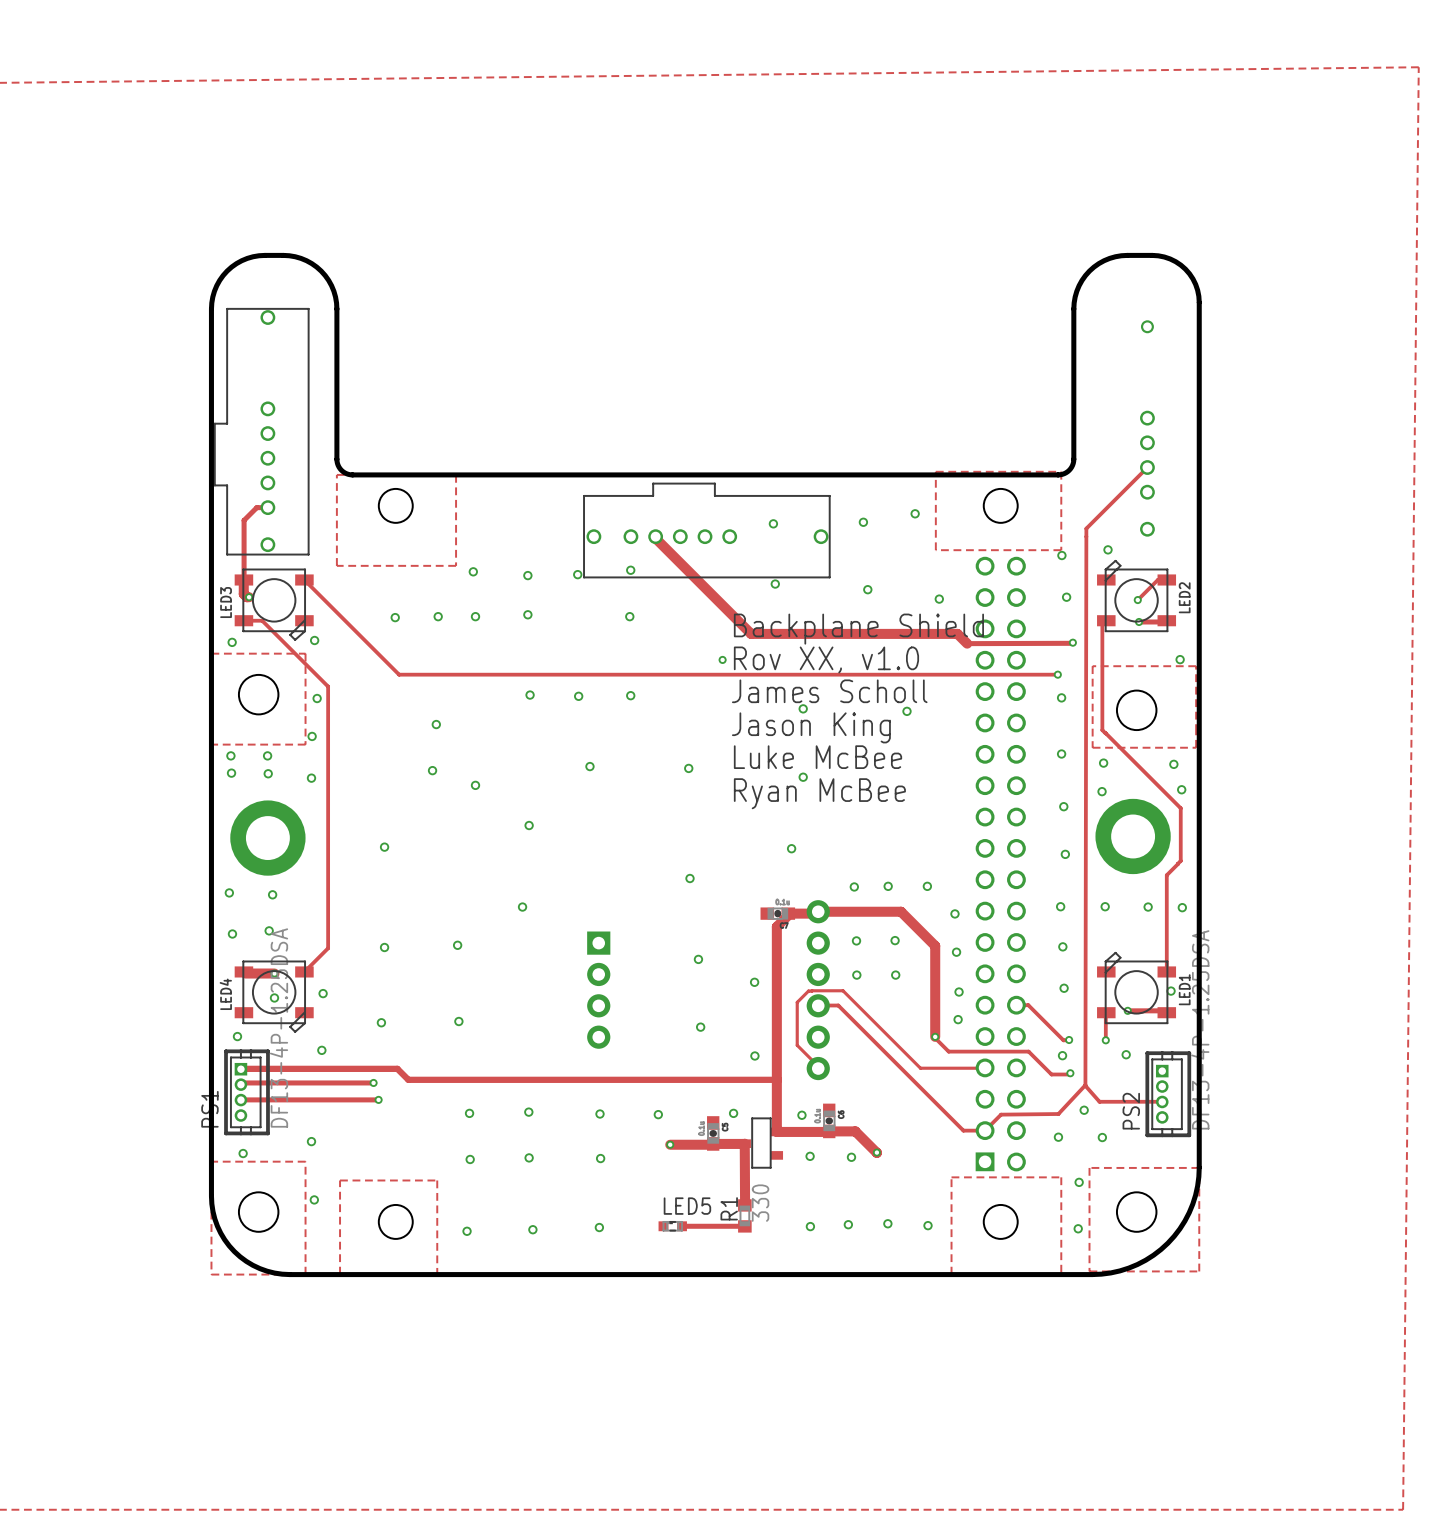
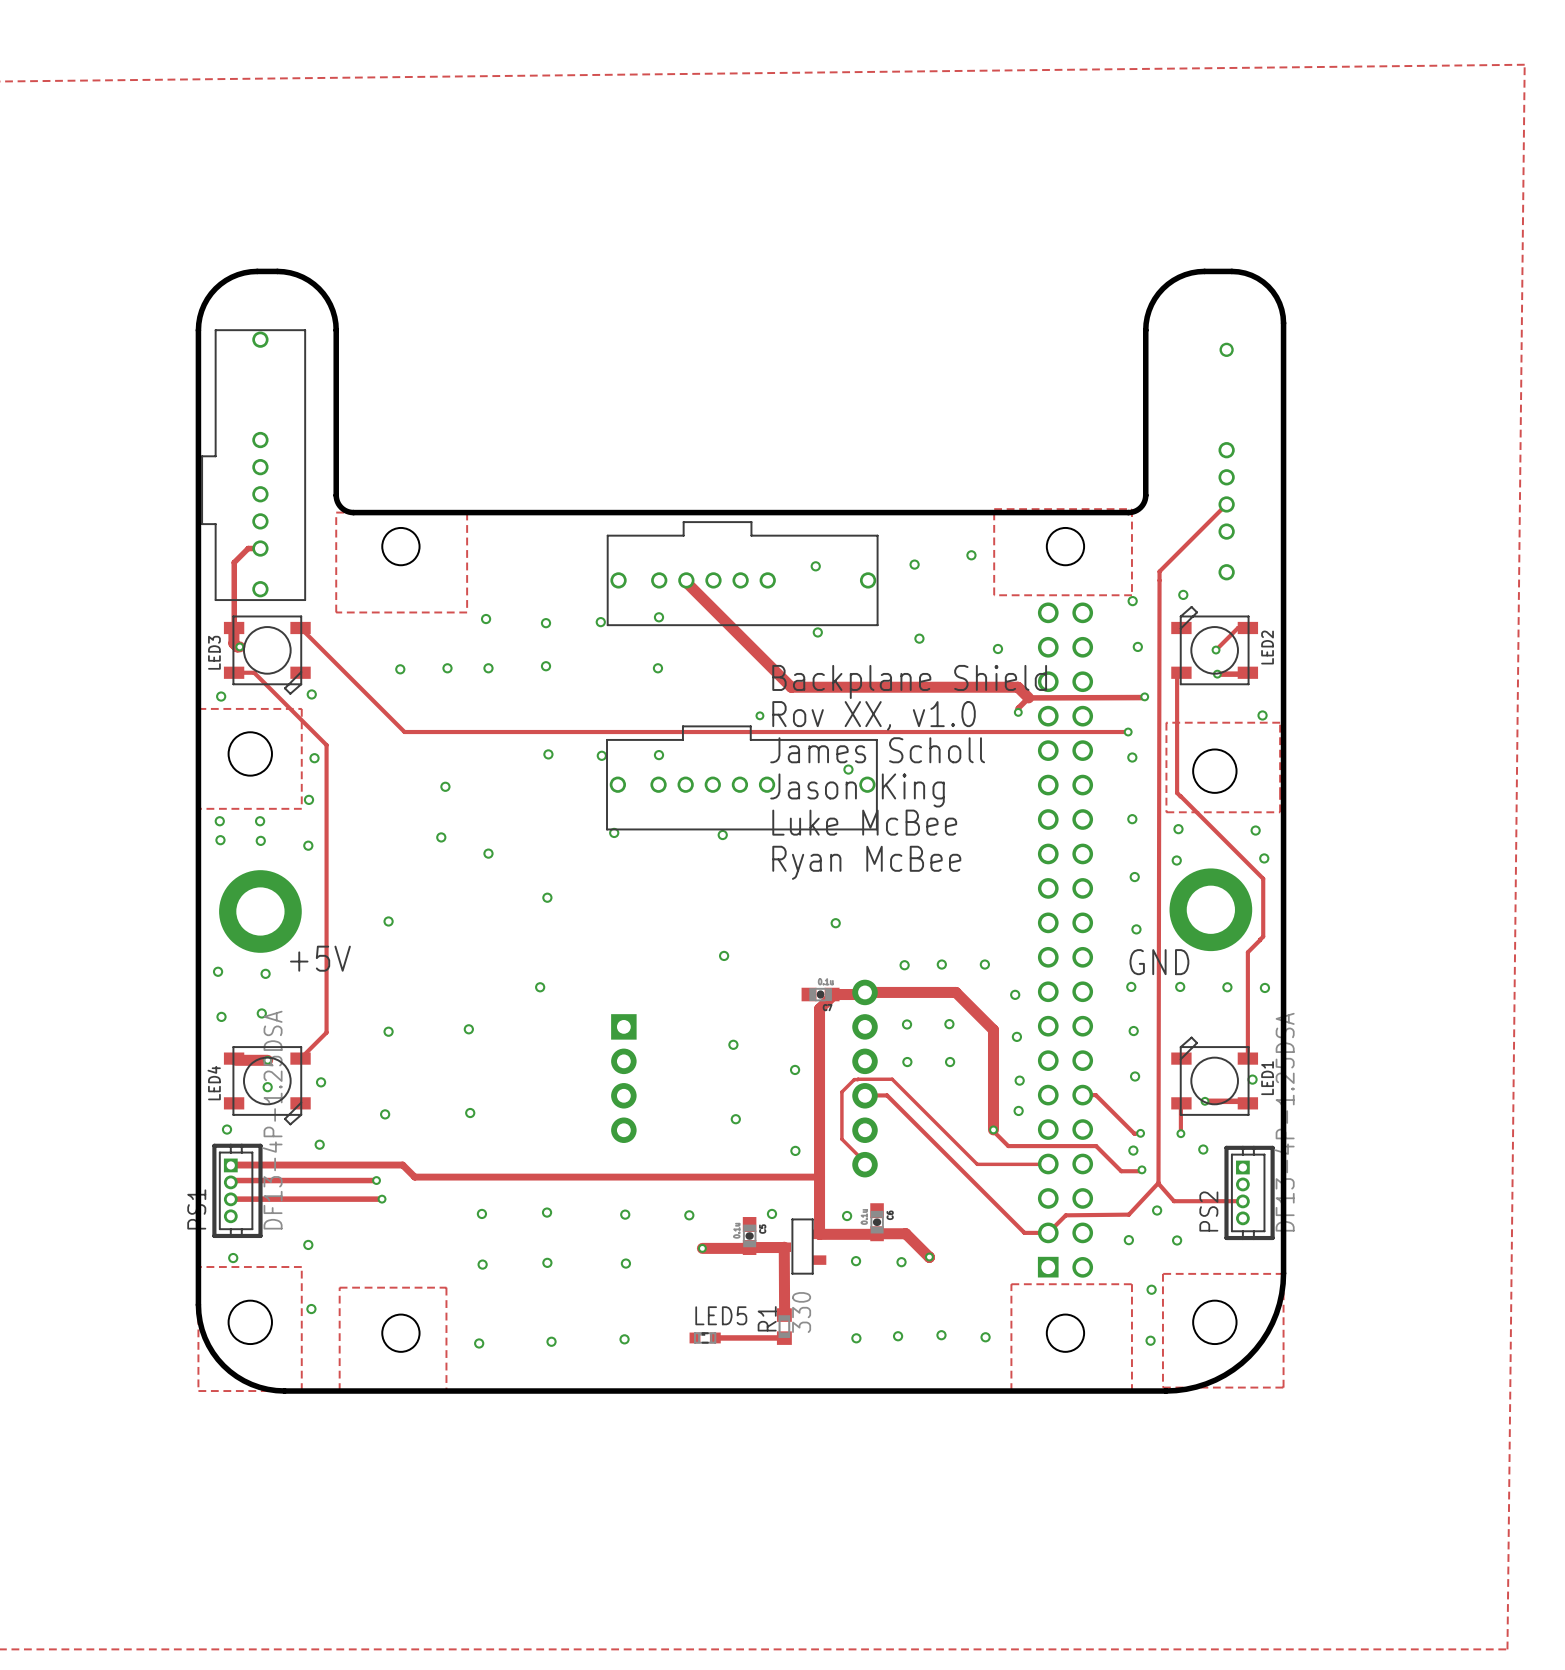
track: none -> (1028, 697) (1018, 708) (1018, 712)
via: none -> (1018, 712)
via: (906, 711) -> none
part: none -> (741, 777)
via: (803, 777) -> none
text: none -> +5V (320, 958)
text: none -> GND (1159, 962)

